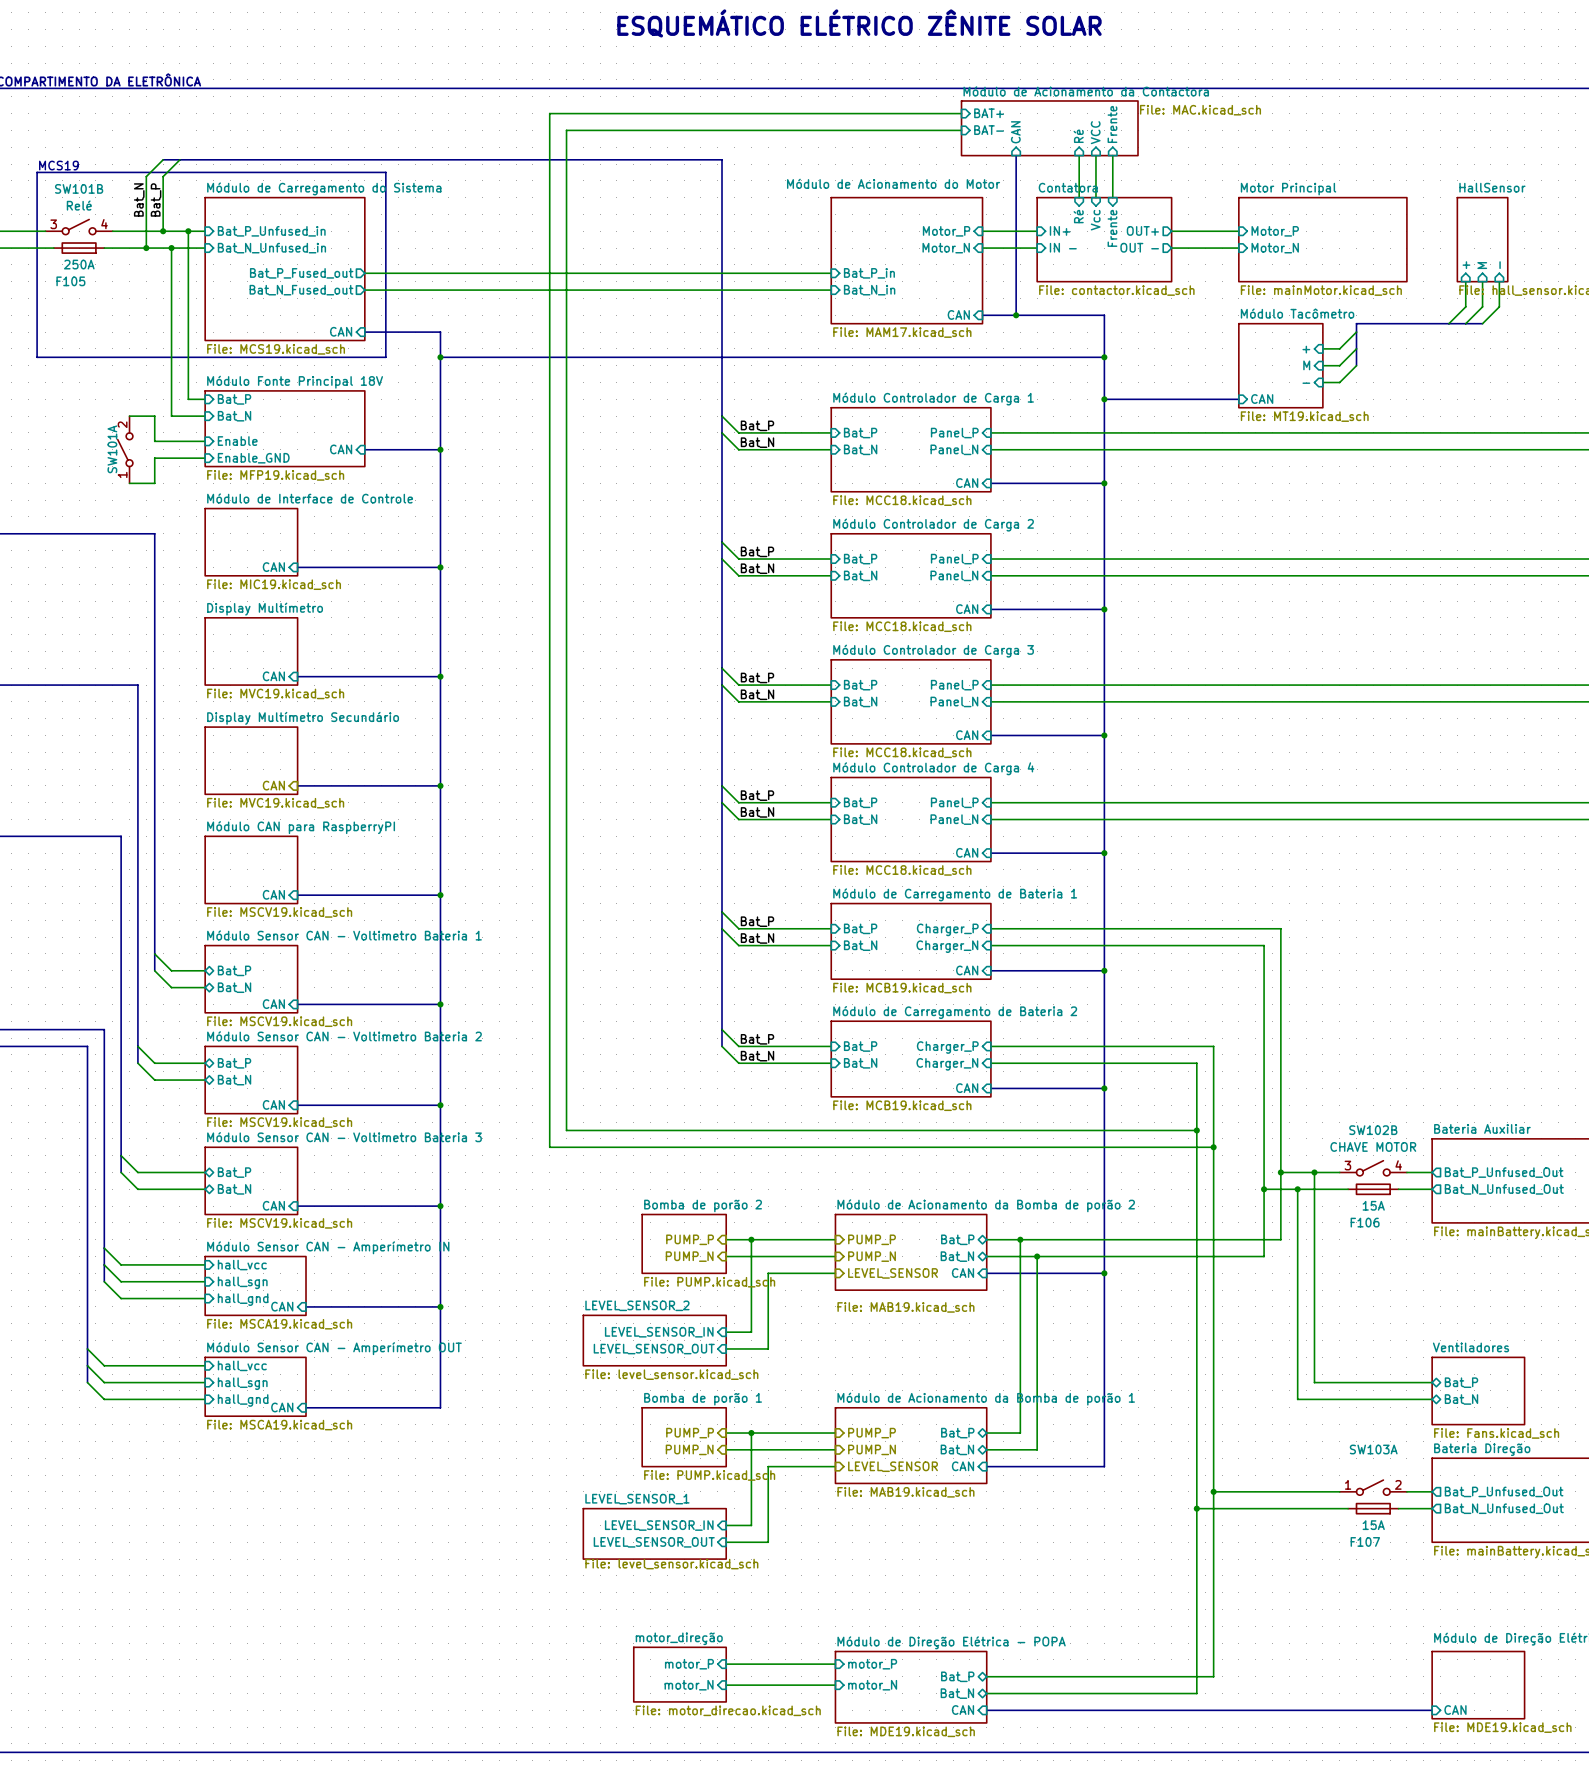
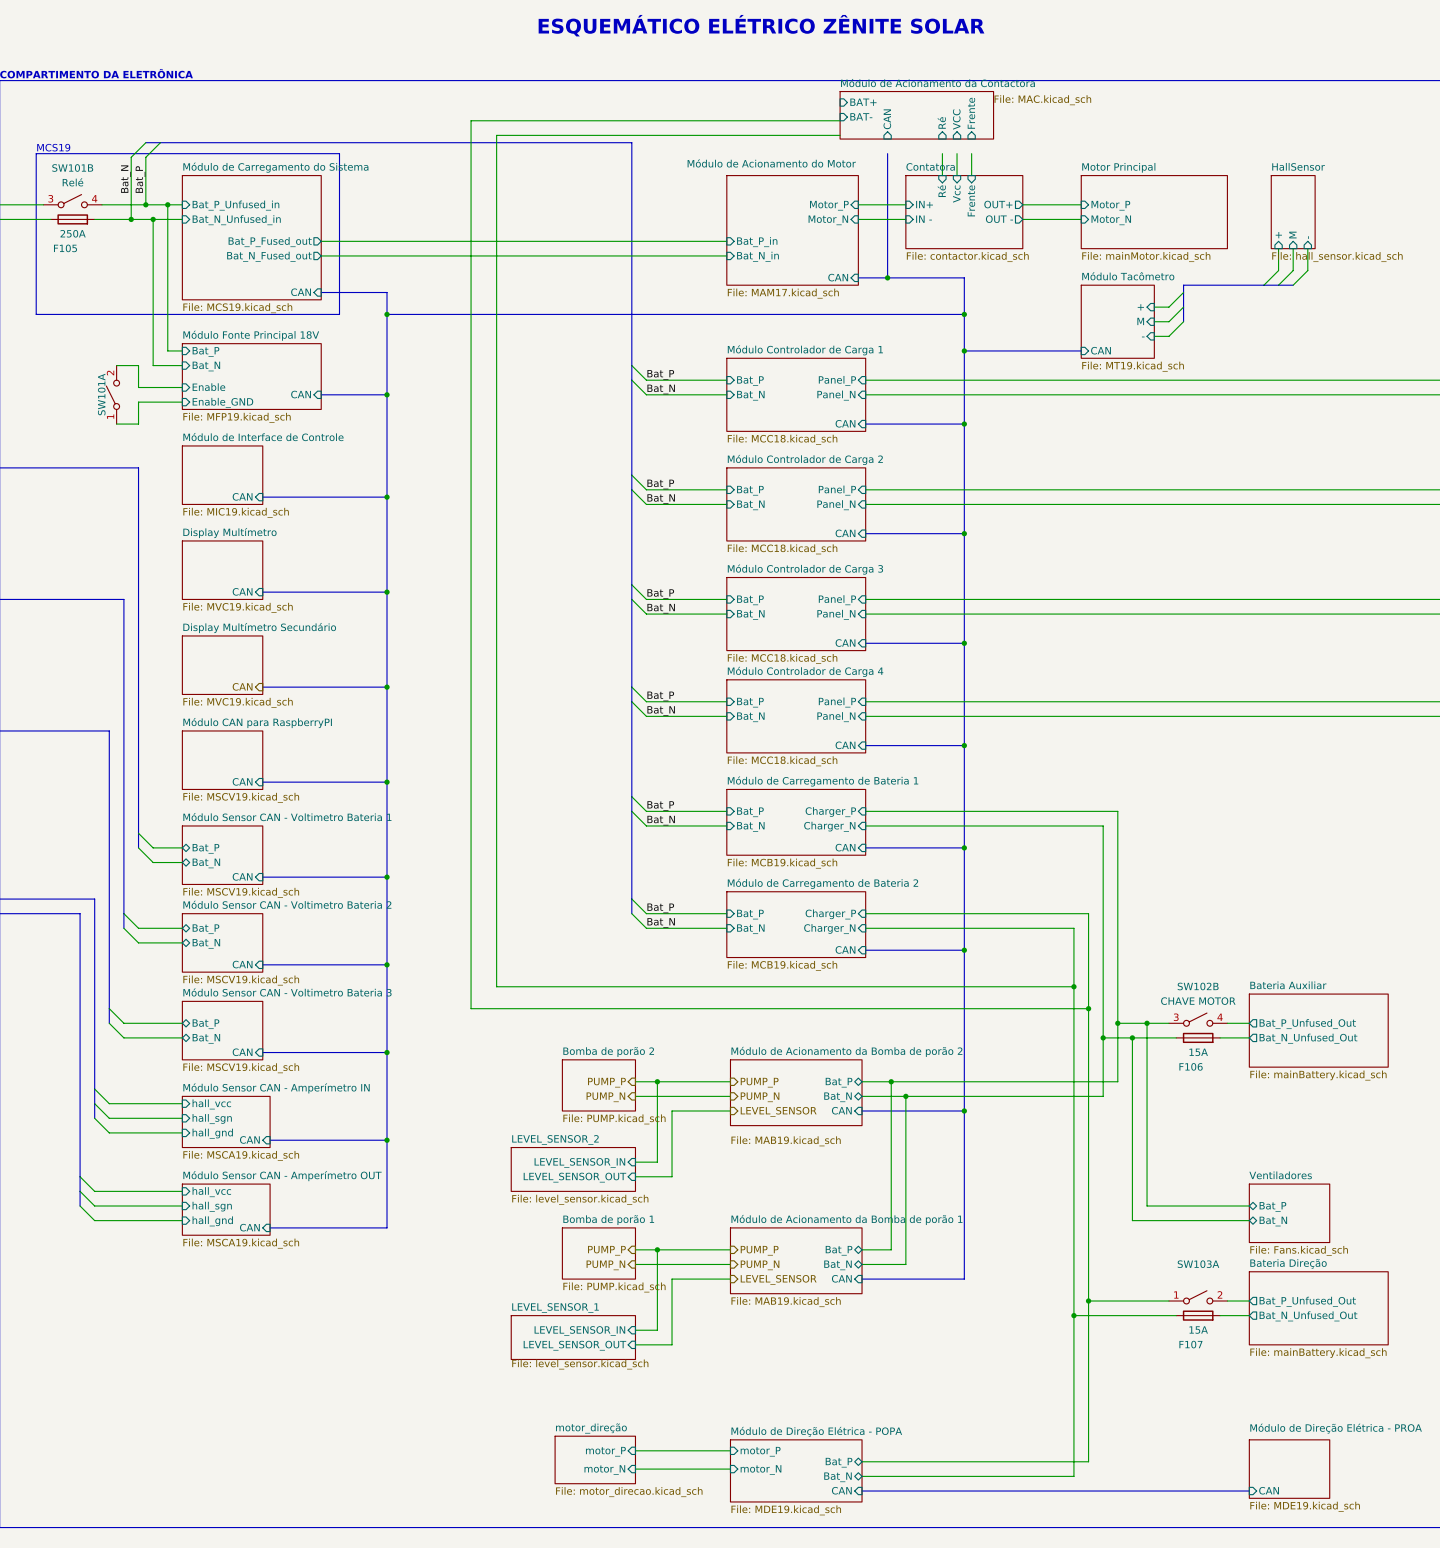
wire: (961, 113) (549, 113) (549, 1147) (1213, 1147) -> none
wire: (961, 130) (566, 130) (566, 151) -> (840, 135) (496, 135)
wire: none -> (840, 120) (471, 120) (471, 1008) (1088, 1008)
bus: (1016, 155) (1016, 172) -> none
wire: (1079, 155) (1079, 172) -> none
wire: (1095, 155) (1095, 172) -> none
wire: (1112, 155) (1112, 172) -> none
wire: (1213, 1046) (1213, 1676) -> (1059, 913) (1088, 913) (1088, 1461) (1059, 1461)
wire: (1196, 1063) (1196, 1693) -> (1044, 928) (1073, 928) (1073, 1476) (1044, 1476)
wire: none -> (1044, 986) (1073, 986)
junction: (1196, 1130) -> none
junction: none -> (1073, 986)
junction: (1213, 1147) -> none
junction: none -> (1088, 1008)
wire: (1213, 1491) (1247, 1491) -> none
junction: (1213, 1491) -> none
junction: none -> (1088, 1301)
wire: (1196, 1508) (1230, 1508) -> none
junction: (1196, 1508) -> none
junction: none -> (1073, 1315)

